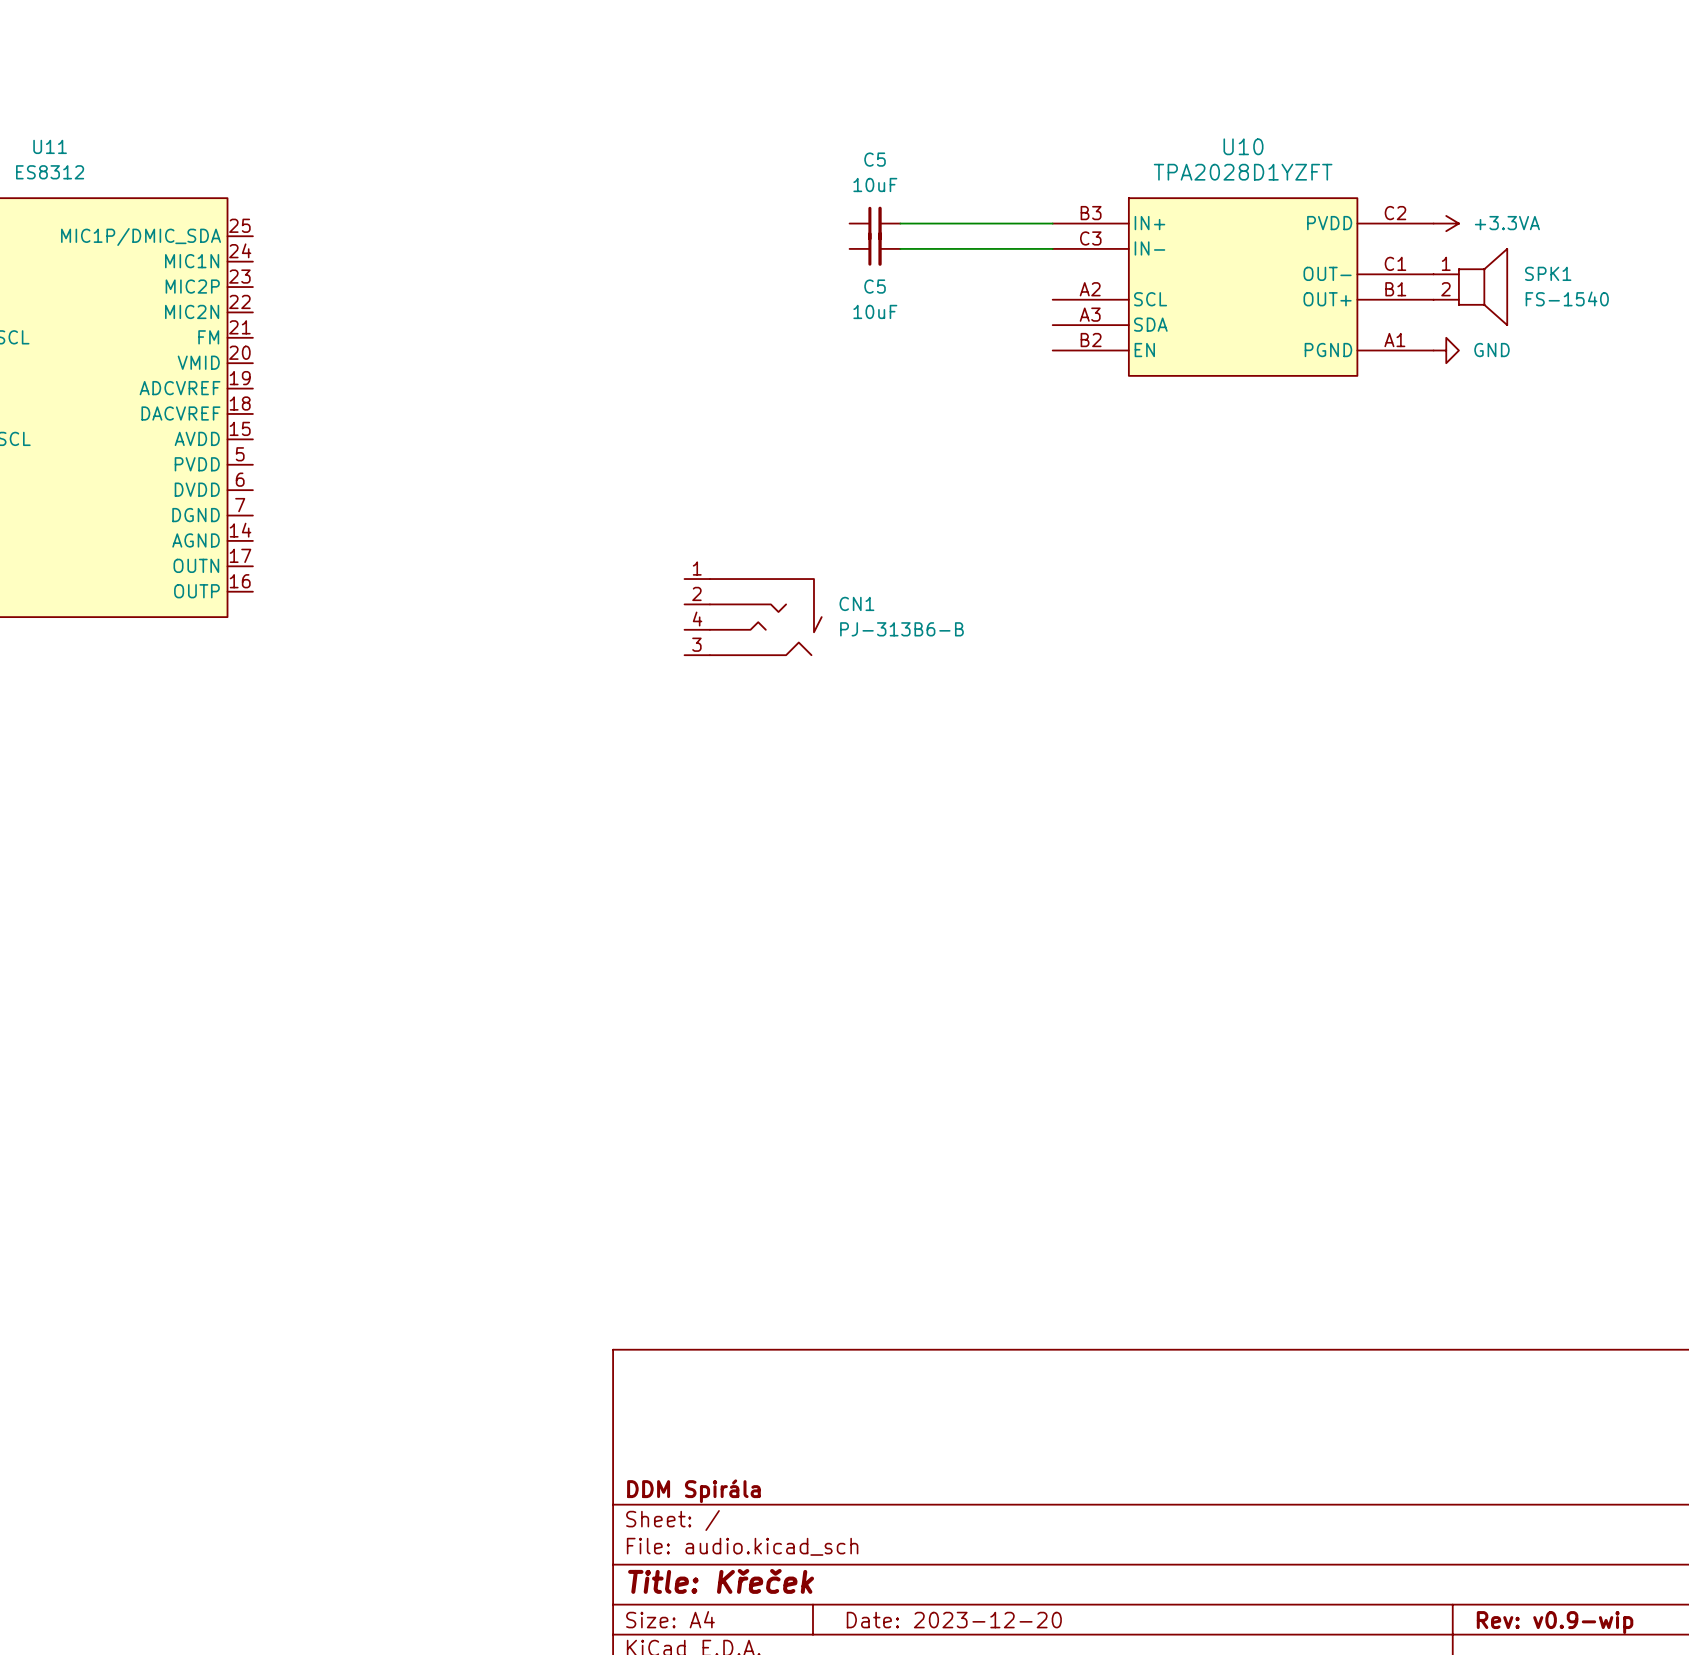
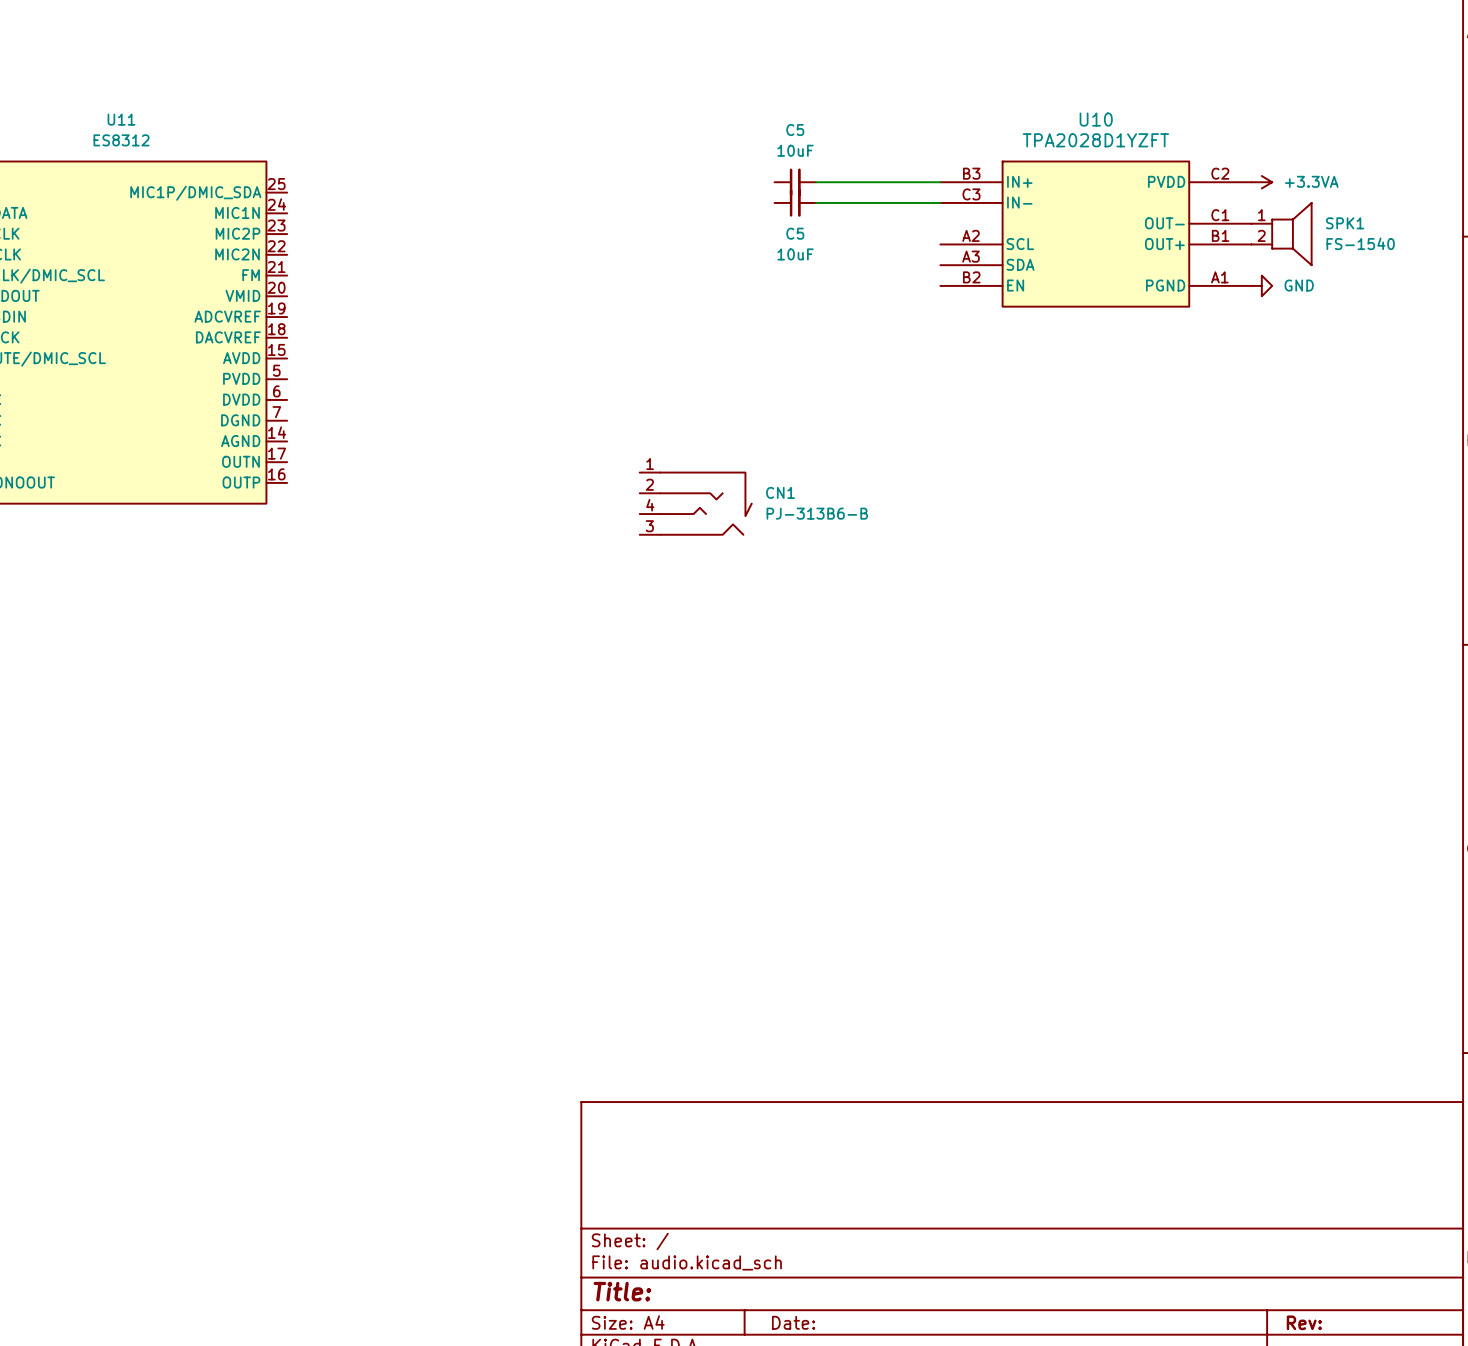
title block: DDM Spirála (693, 1491) -> none
title block: Title: Křeček (721, 1581) -> Title: (622, 1291)
title block: Date: 2023-12-20 (954, 1620) -> Date: (793, 1322)
title block: Rev: v0.9-wip (1555, 1622) -> Rev: (1304, 1322)

